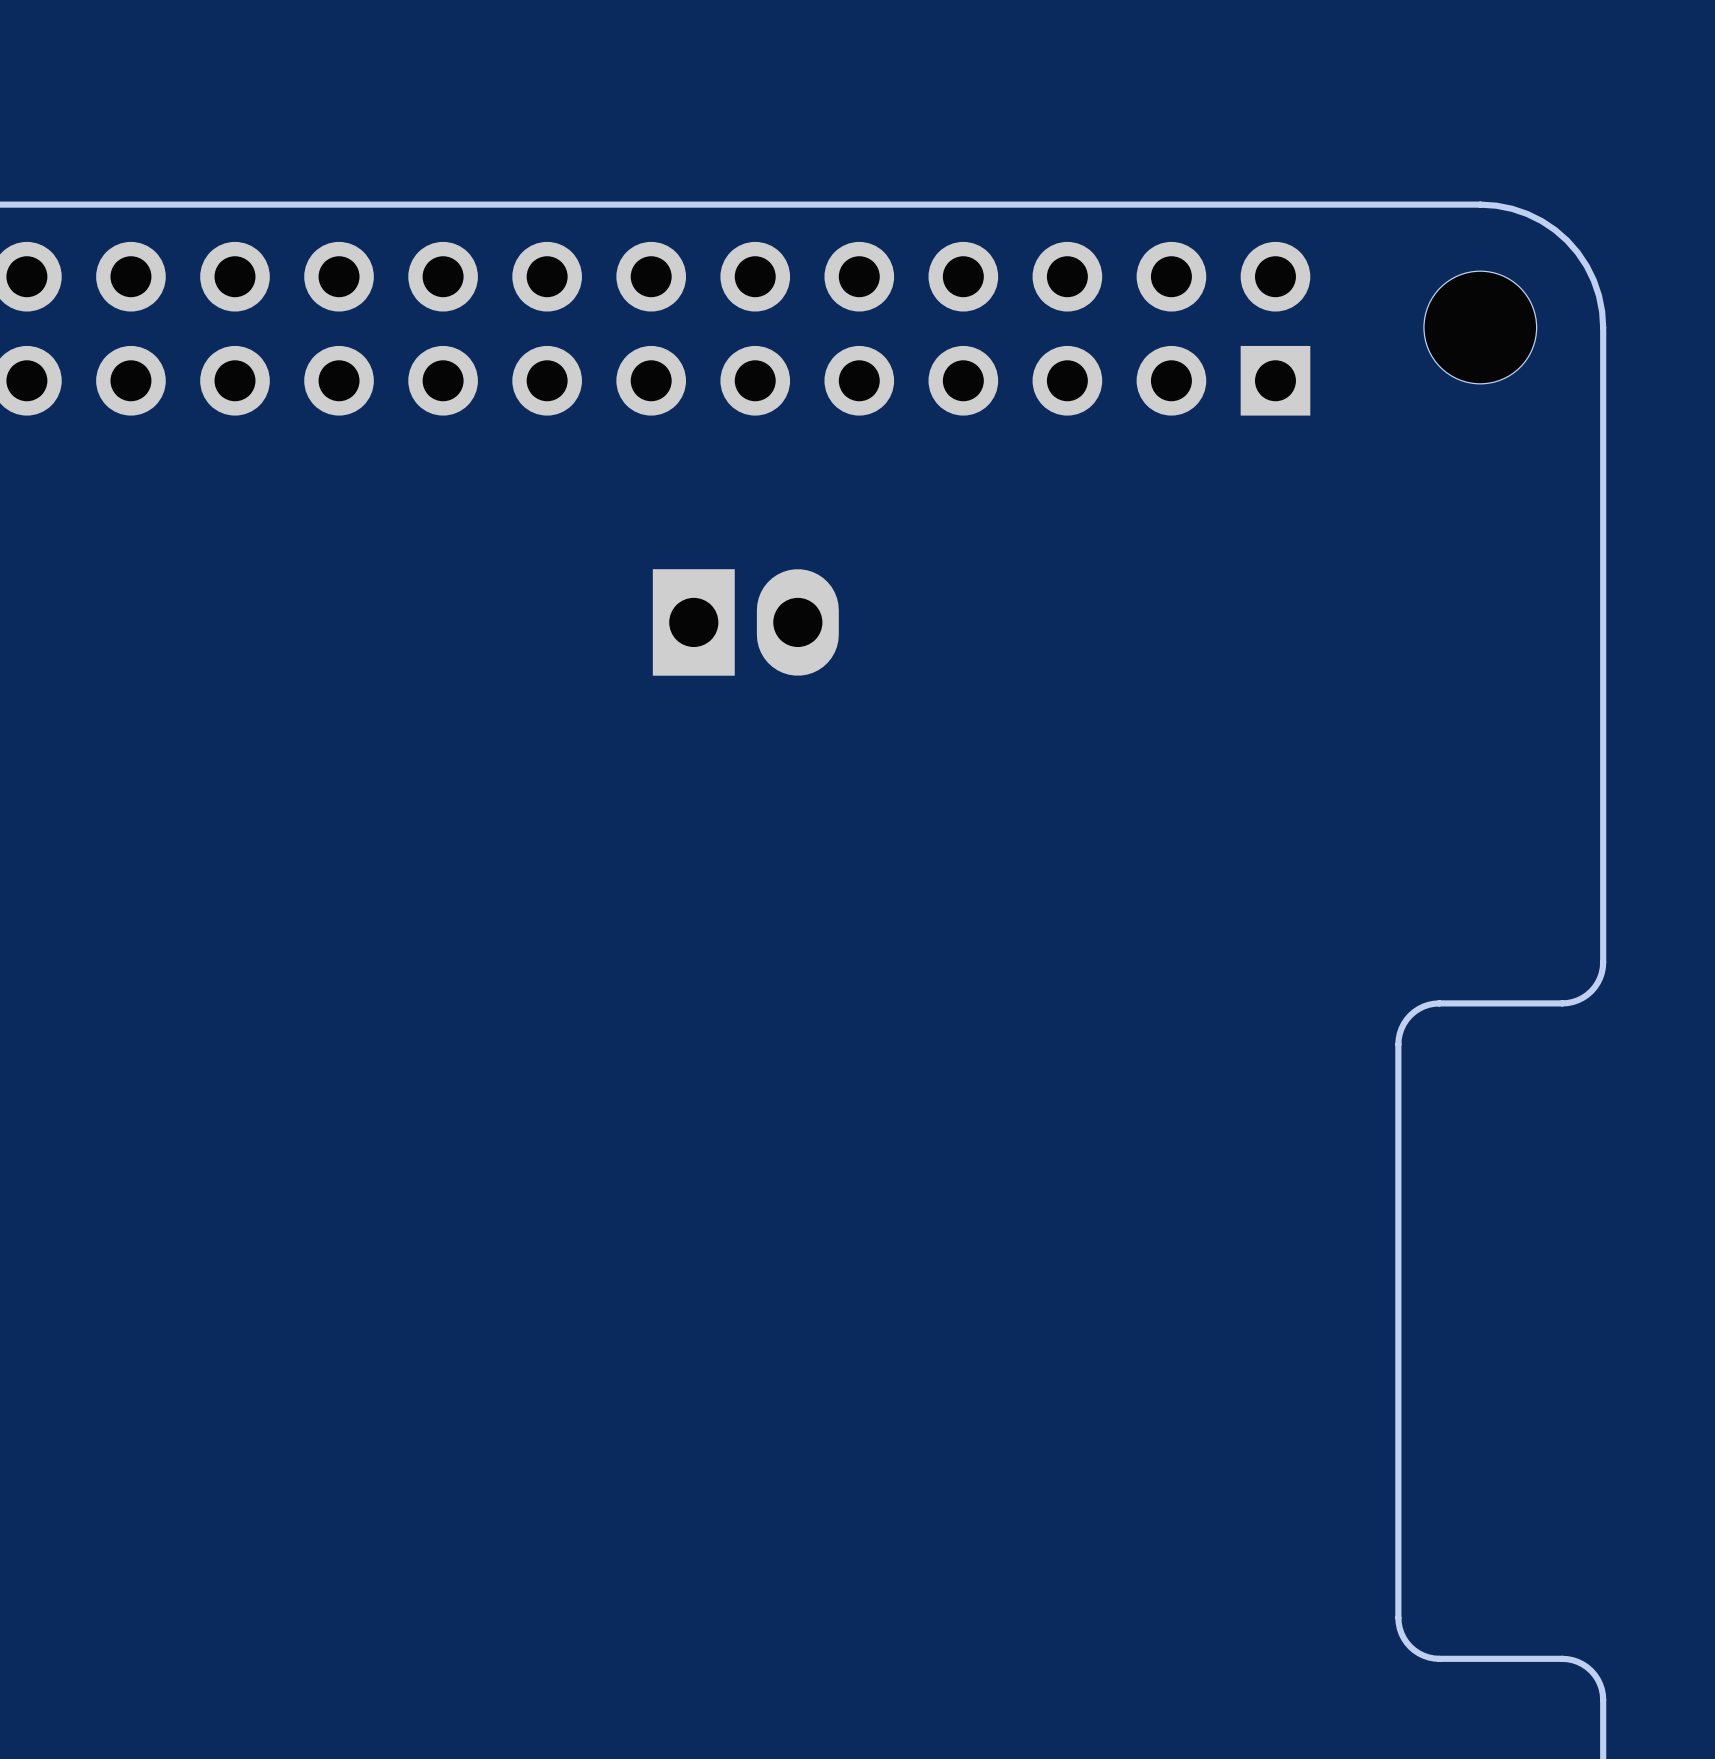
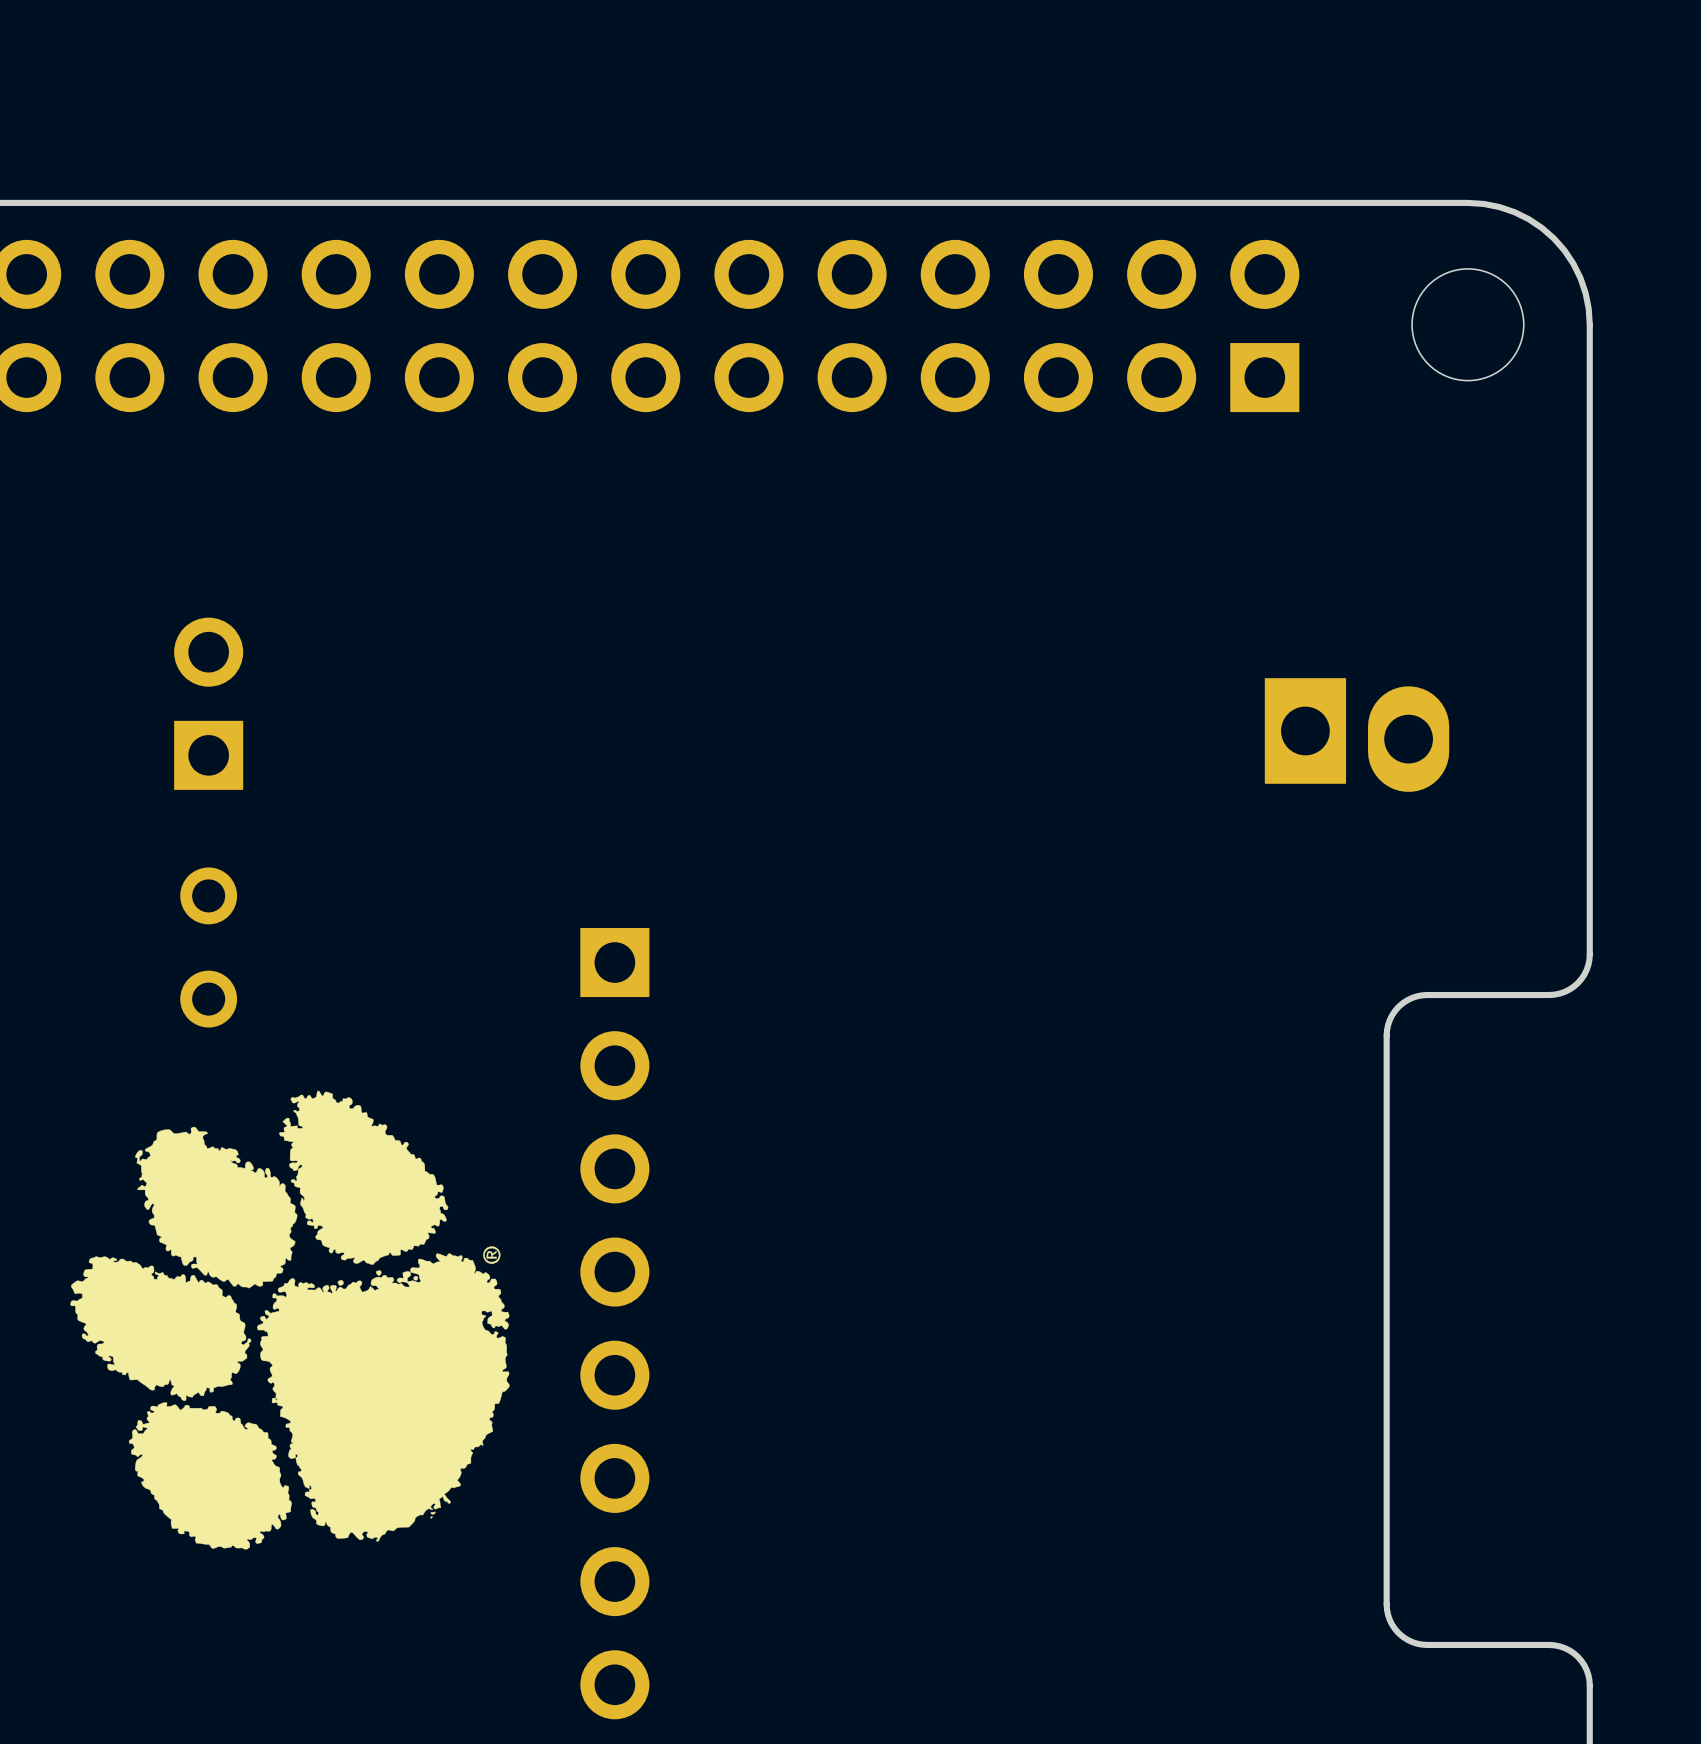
part: (745, 622) -> none
part: none -> (208, 703)
part: none -> (1357, 735)
part: none -> (208, 947)
drawing: none -> [70, 1090, 510, 1550]
part: none -> (614, 1323)

